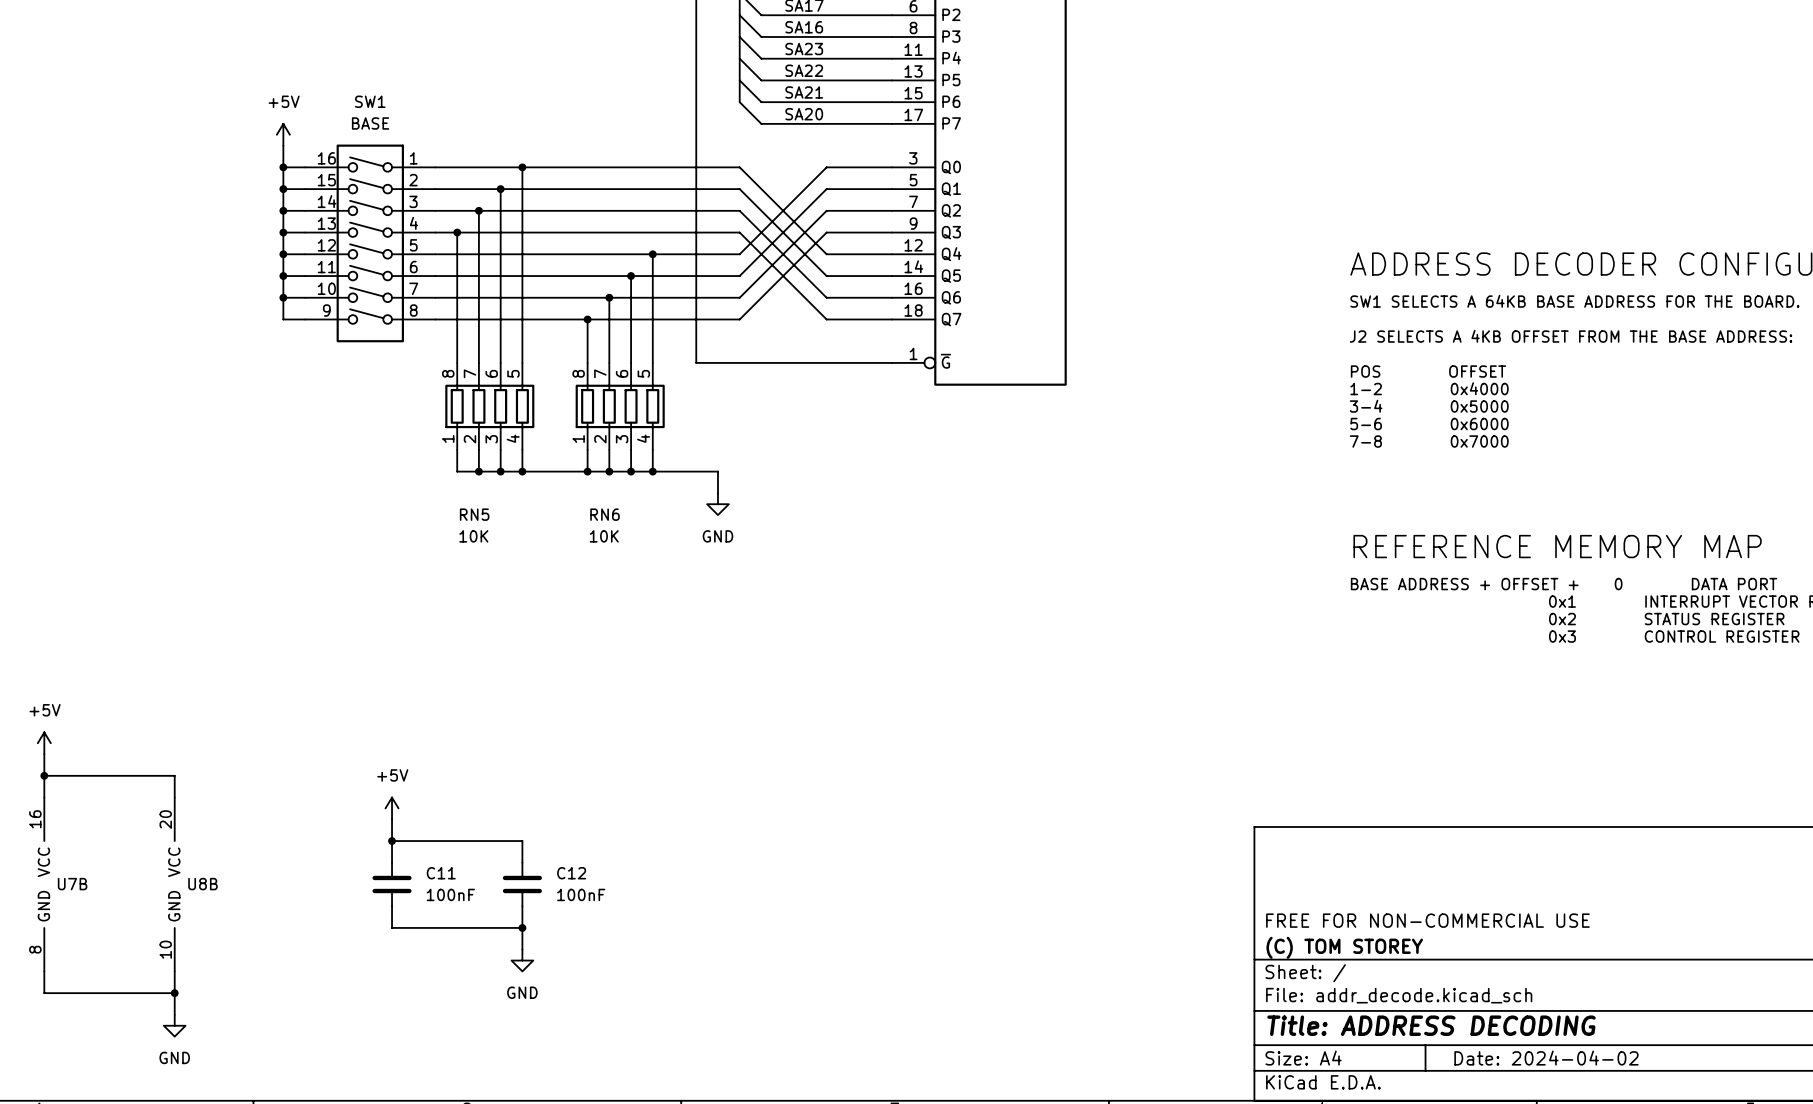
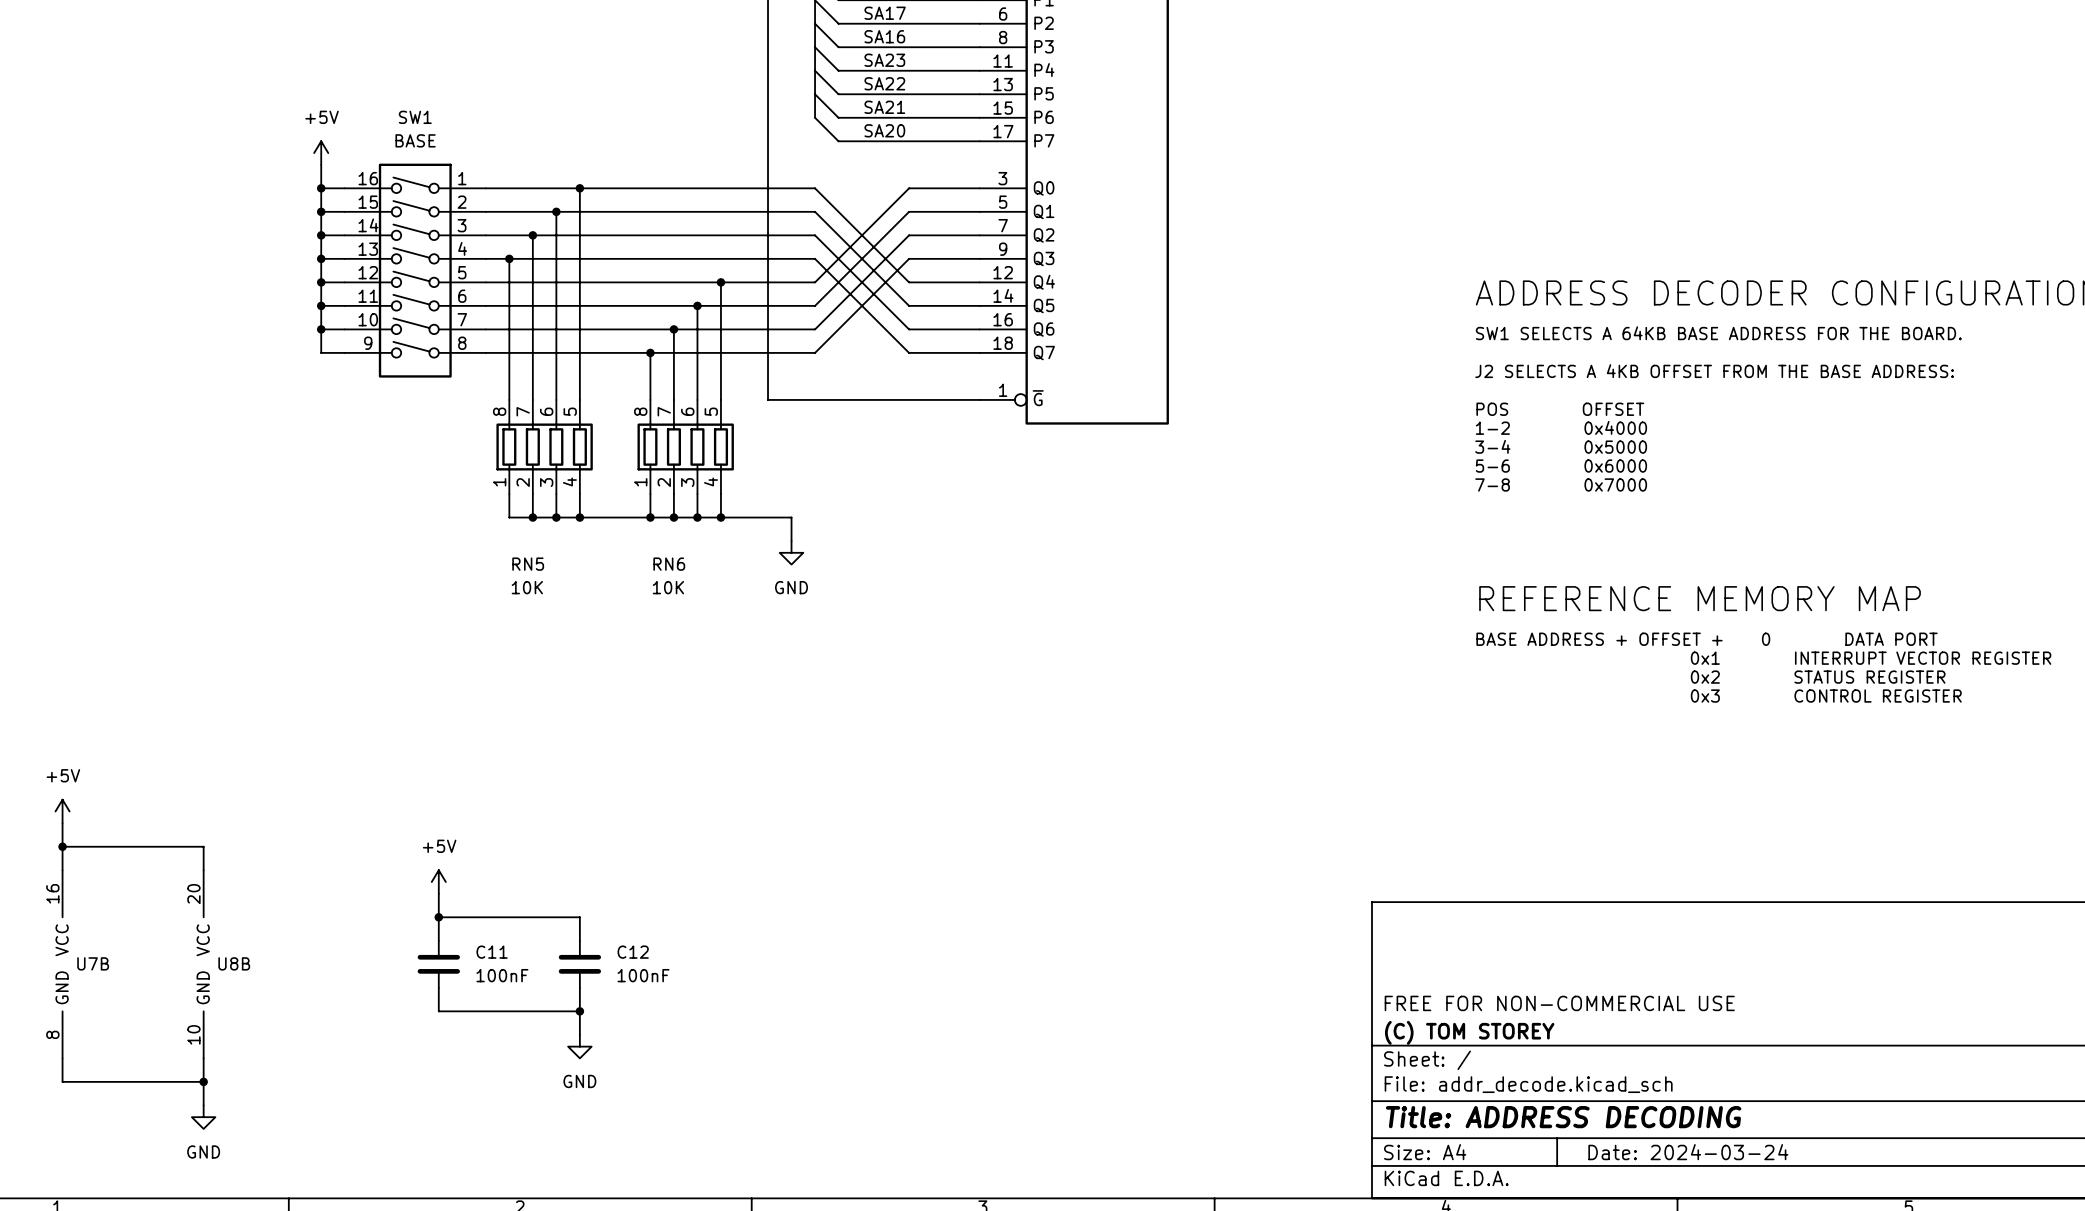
title block: Date: 2024-04-02 (1546, 1058) -> Date: 2024-03-24 (1688, 1152)

